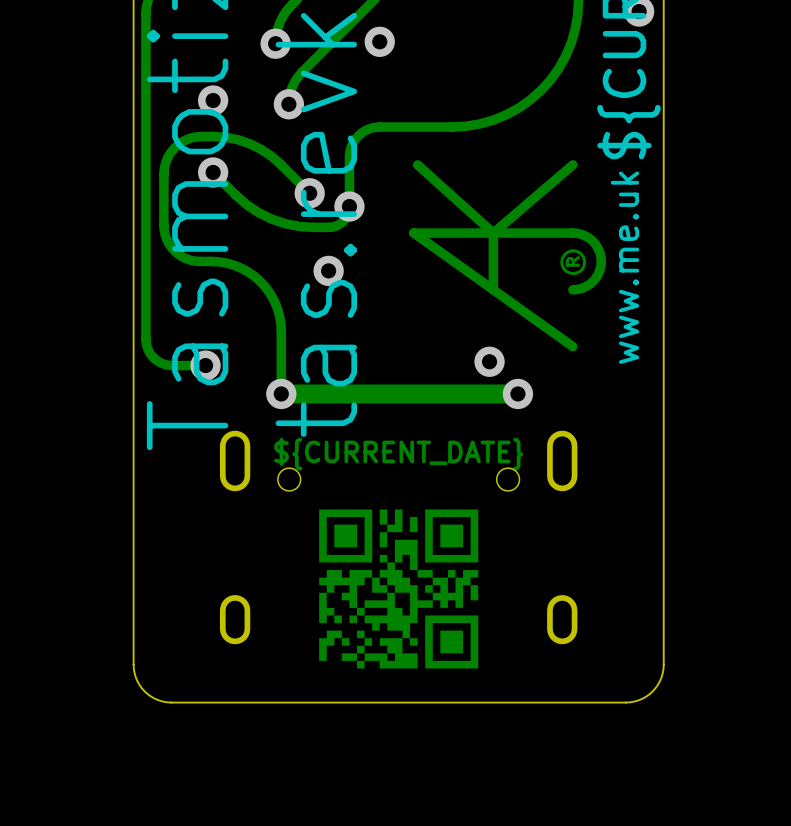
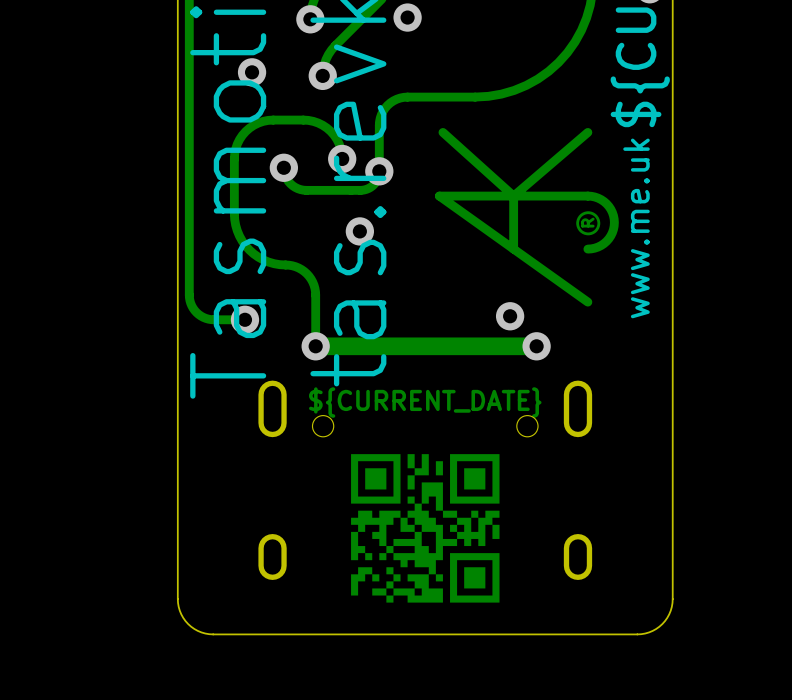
track: (213, 172) (246, 204) (258, 212) (285, 223) (299, 226) (333, 226) (344, 219) (349, 206) -> (283, 167) (285, 176) (290, 183) (297, 188) (306, 190) (364, 189) (375, 183) (379, 171)
via position: (213, 172) -> (283, 167)
track: (309, 193) (281, 164) (261, 149) (237, 139) (225, 137) (197, 136) (185, 140) (172, 150) (164, 165) (164, 230) (171, 247) (186, 258) (226, 263) (241, 268) (254, 276) (266, 287) (274, 301) (279, 315) (281, 339) -> (342, 158) (339, 144) (330, 131) (318, 123) (303, 120) (268, 120) (258, 123) (242, 135) (234, 153) (234, 219) (242, 241) (249, 249) (263, 259) (274, 263) (292, 265) (304, 271) (312, 282) (315, 295)

